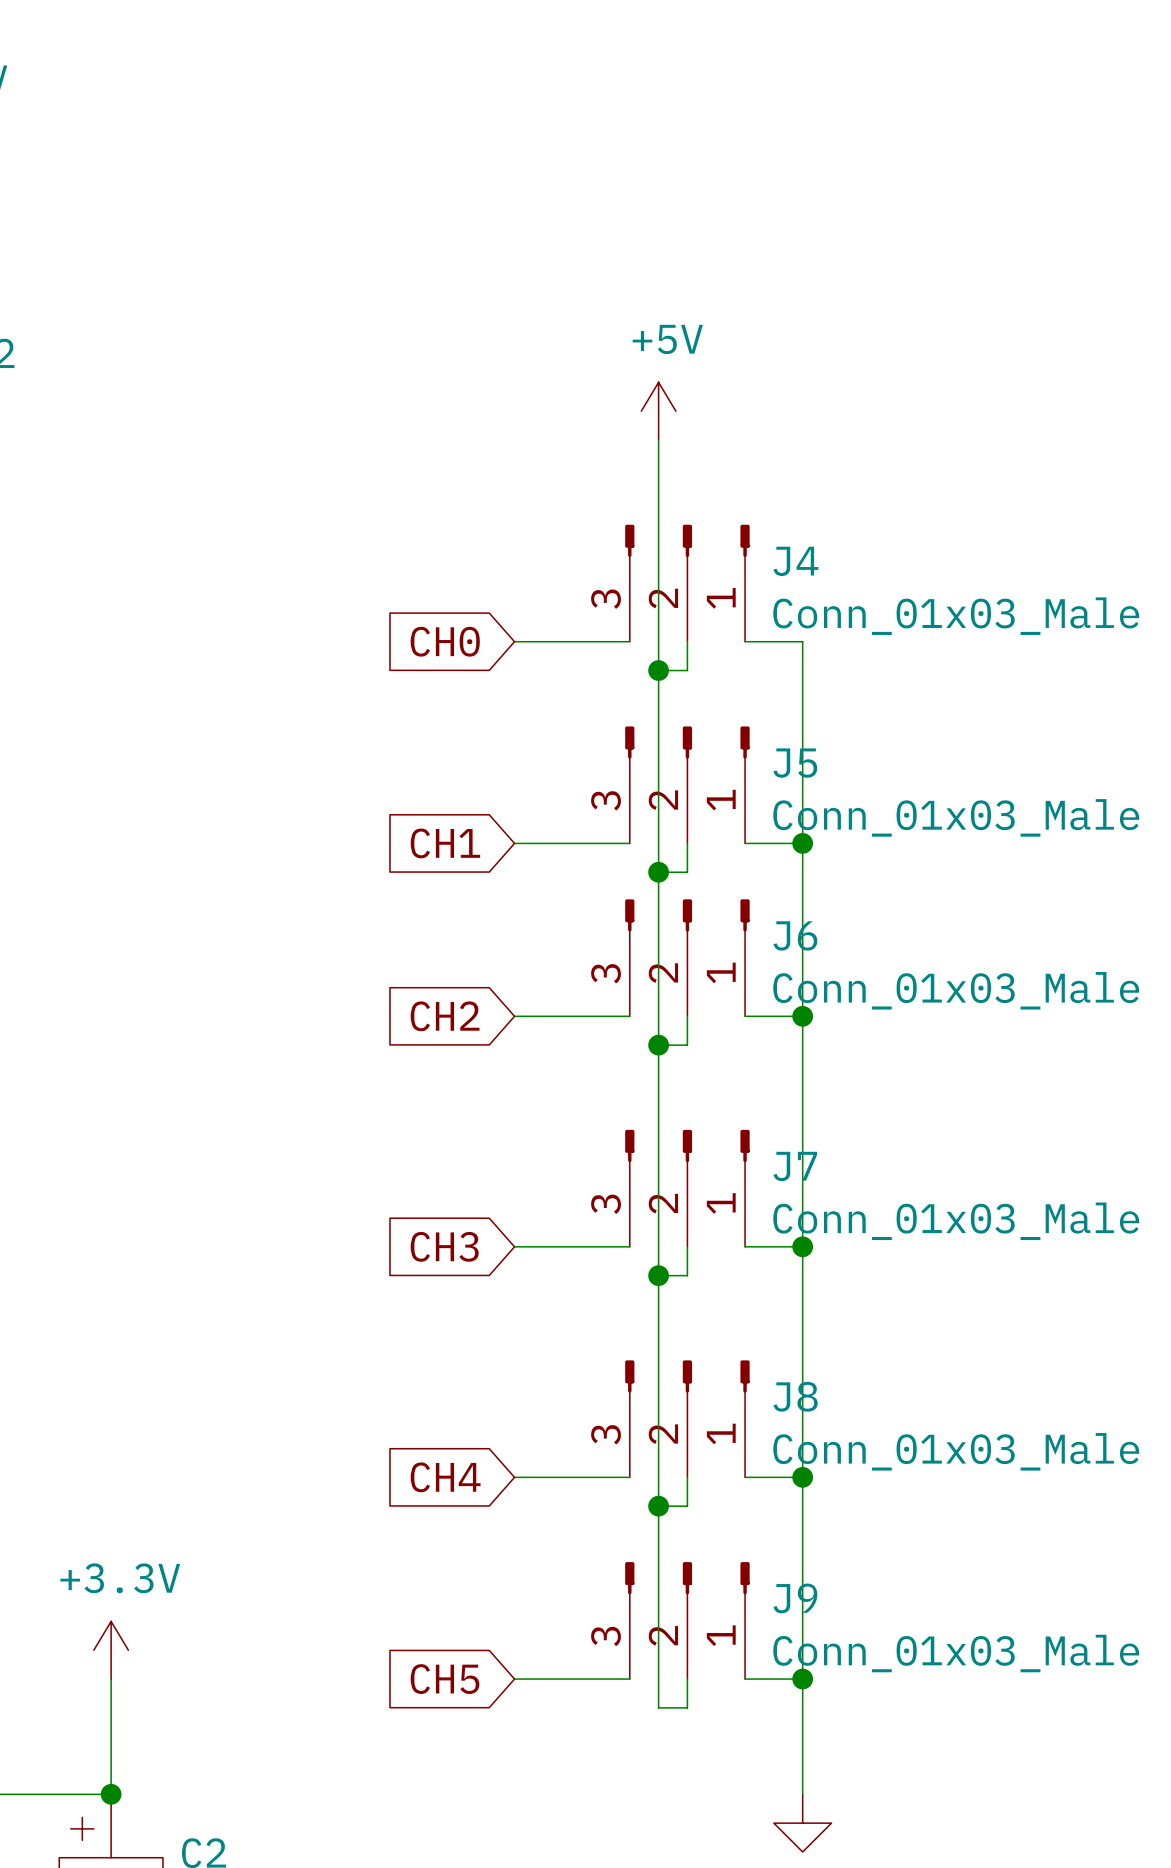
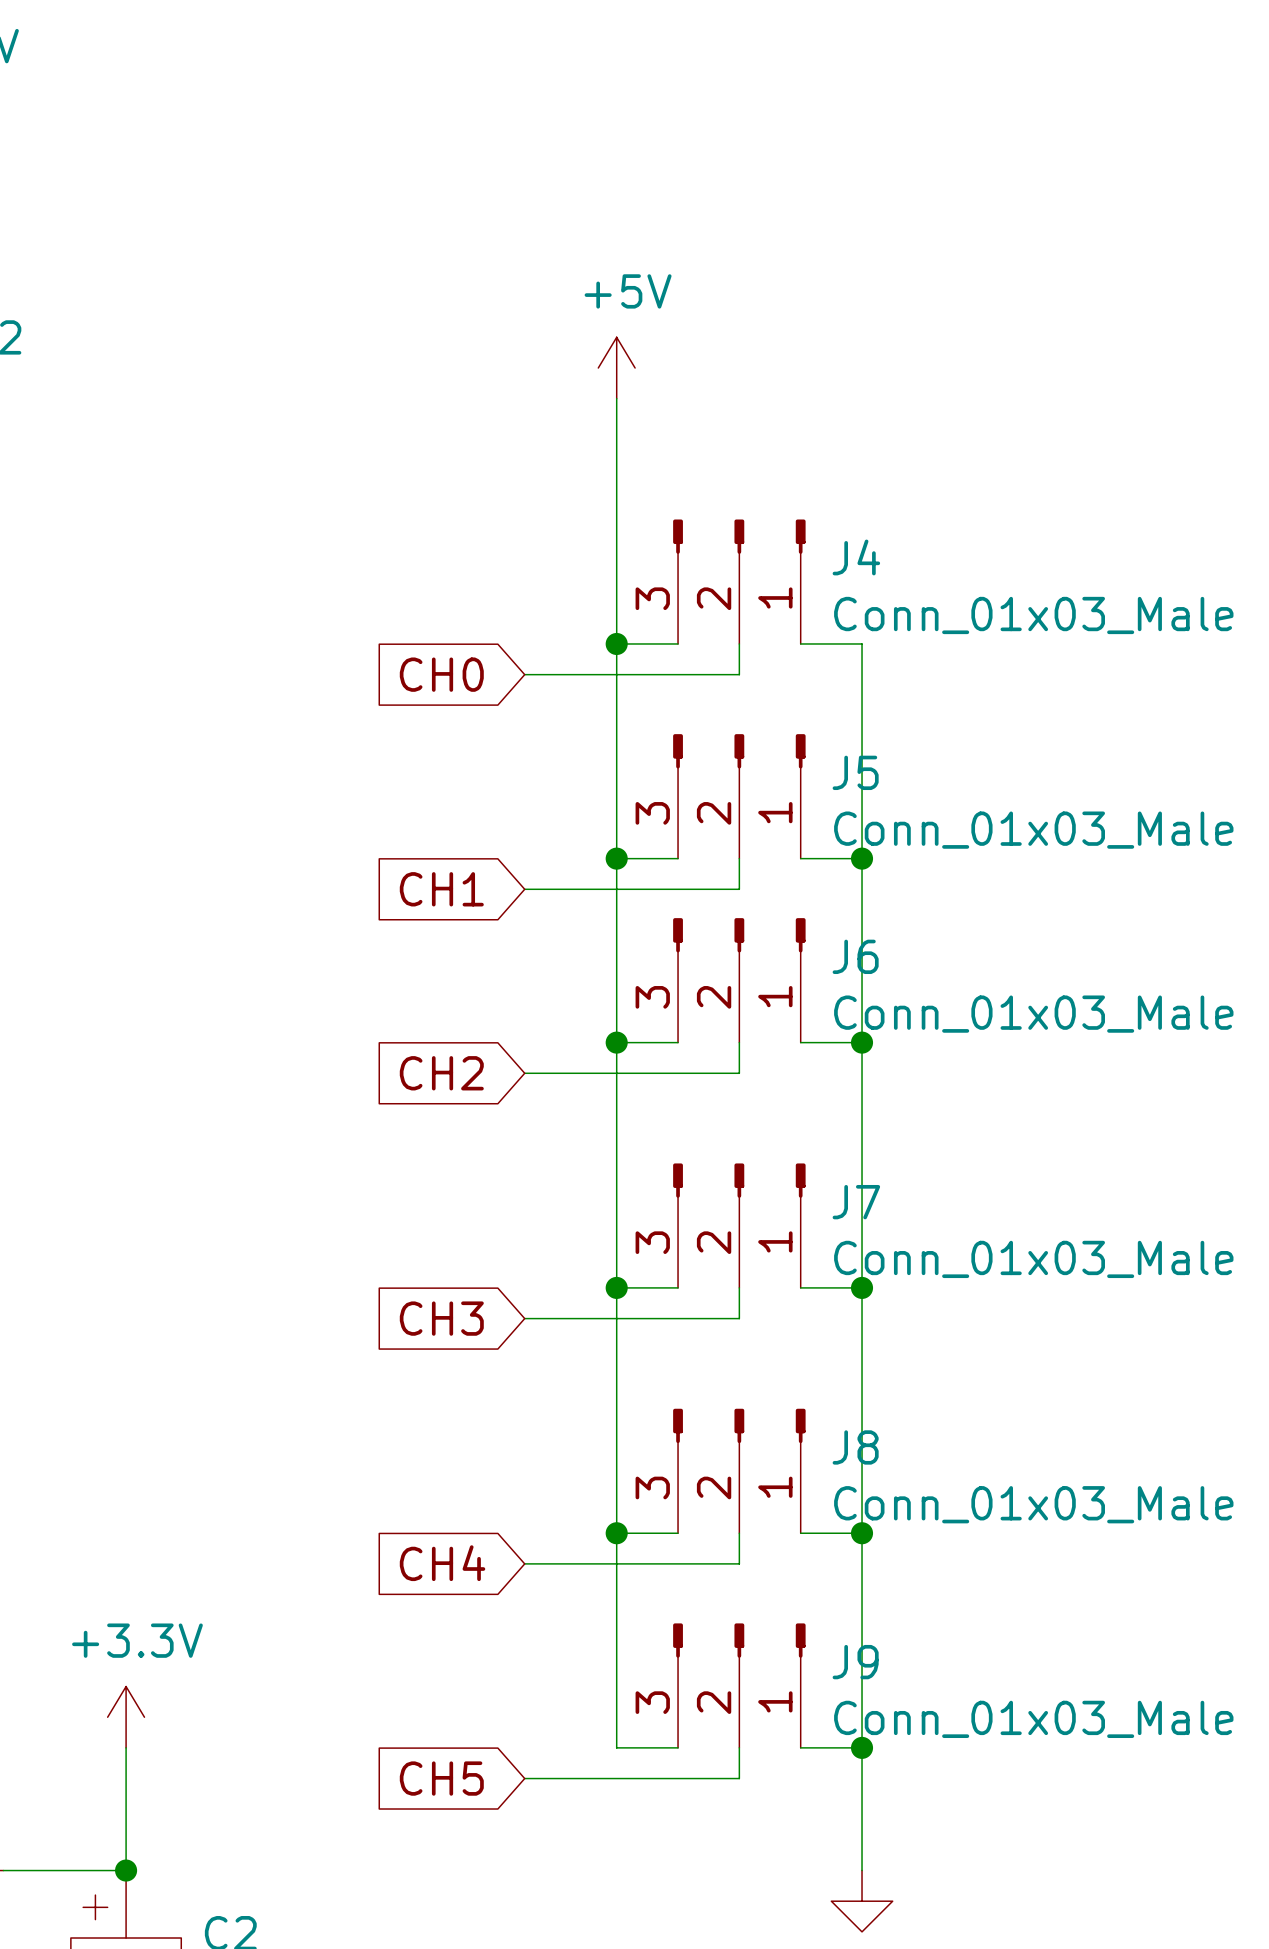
power symbol position: +5V (658, 411) -> +5V (616, 368)
wire: (658, 440) (658, 1707) -> (524, 1778) (708, 1778)
global label position: CH0 (445, 641) -> CH0 (441, 674)
wire: (514, 641) (572, 641) -> none
wire: none -> (524, 674) (708, 674)
junction position: (658, 670) -> (616, 643)
global label position: CH1 (445, 843) -> CH1 (441, 889)
wire: (514, 843) (572, 843) -> none
junction: none -> (616, 858)
wire: none -> (524, 889) (708, 889)
junction: (658, 872) -> none
global label position: CH2 (445, 1016) -> CH2 (441, 1073)
wire: (514, 1016) (572, 1016) -> none
junction: none -> (616, 1042)
wire: none -> (524, 1073) (708, 1073)
junction: (658, 1045) -> none
global label position: CH3 (444, 1246) -> CH3 (441, 1318)
wire: (514, 1246) (572, 1246) -> none
wire: none -> (524, 1318) (708, 1318)
junction position: (658, 1275) -> (616, 1287)
global label position: CH4 (445, 1477) -> CH4 (442, 1563)
wire: (514, 1477) (572, 1477) -> none
wire: none -> (524, 1563) (708, 1563)
junction position: (658, 1506) -> (616, 1533)
global label position: CH5 (445, 1679) -> CH5 (441, 1778)
wire: (514, 1679) (572, 1679) -> (616, 398) (616, 1747)

